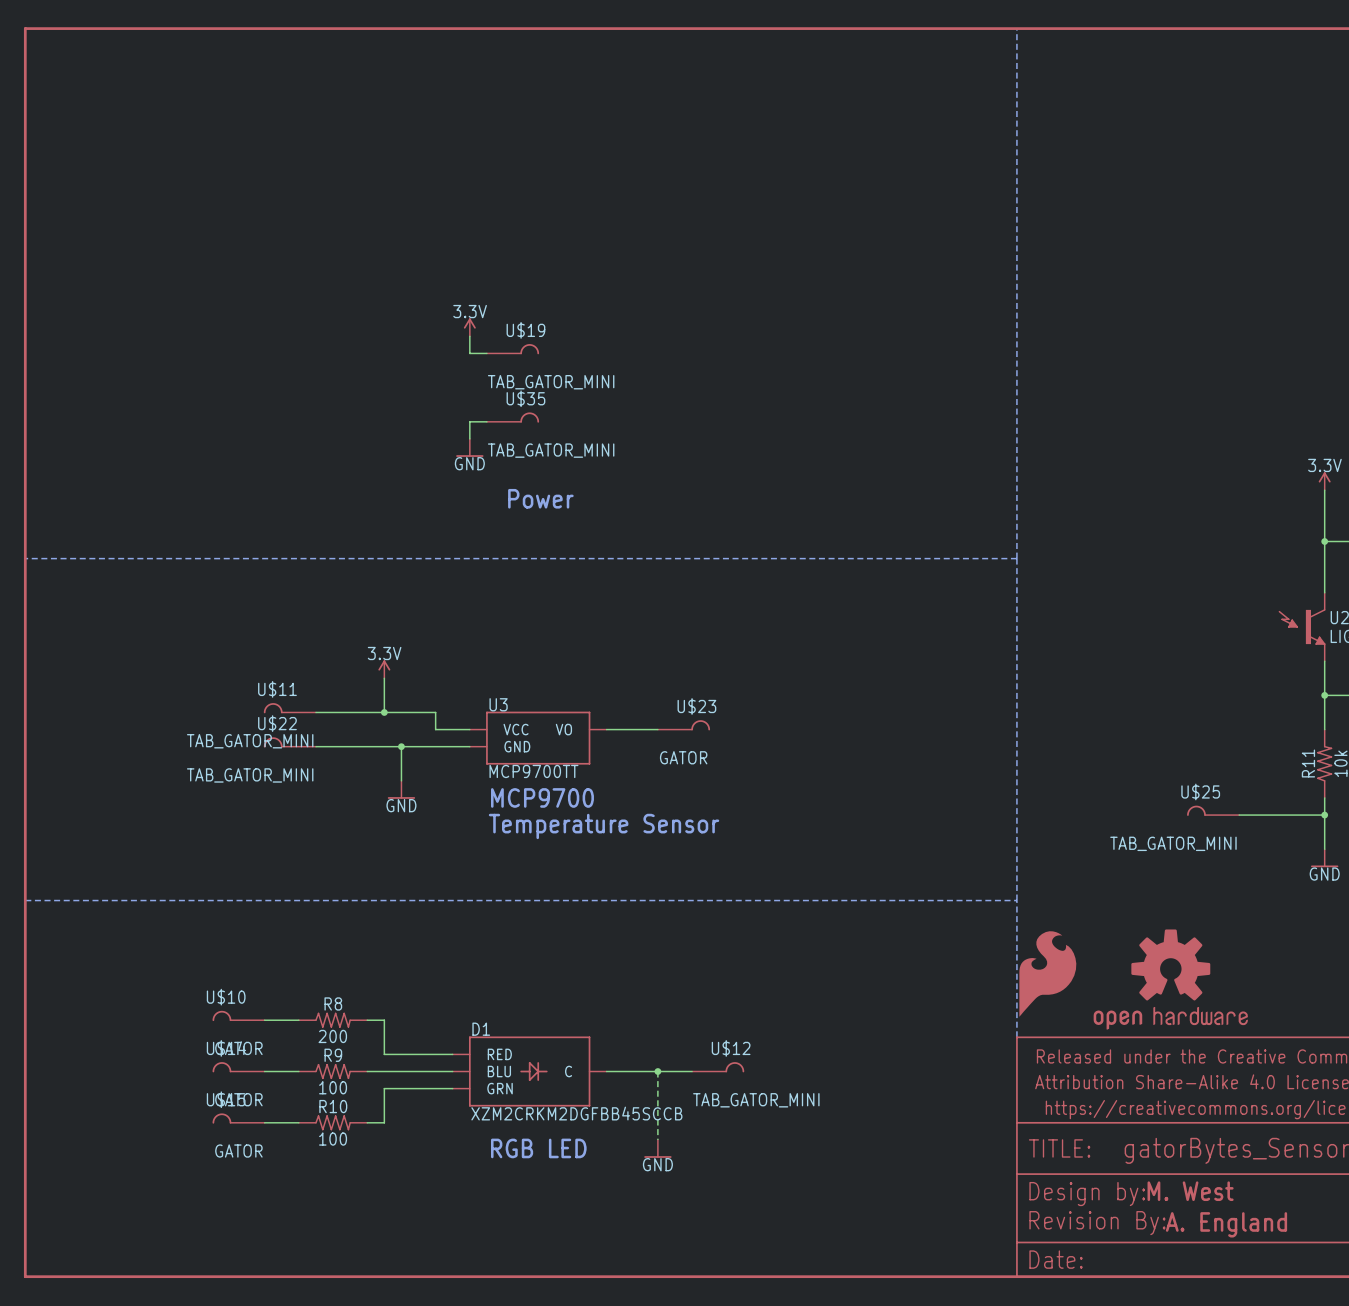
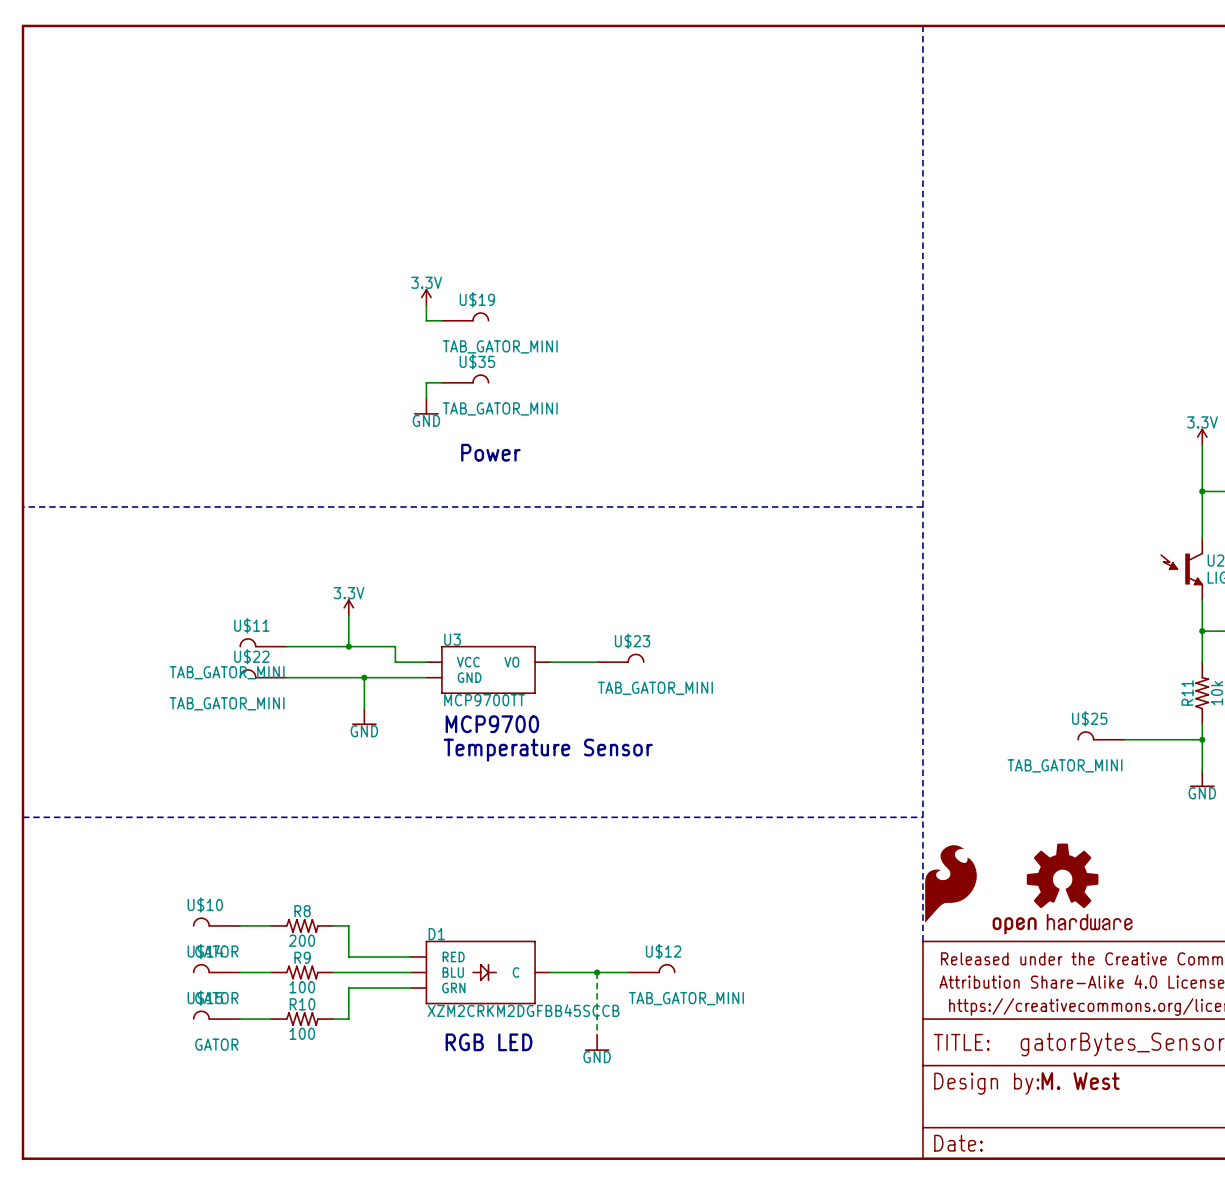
U$23 value: GATOR (683, 757) -> TAB_GATOR_MINI (655, 688)
part: (1097, 1223) -> none
text: A. England (1226, 1224) -> none

